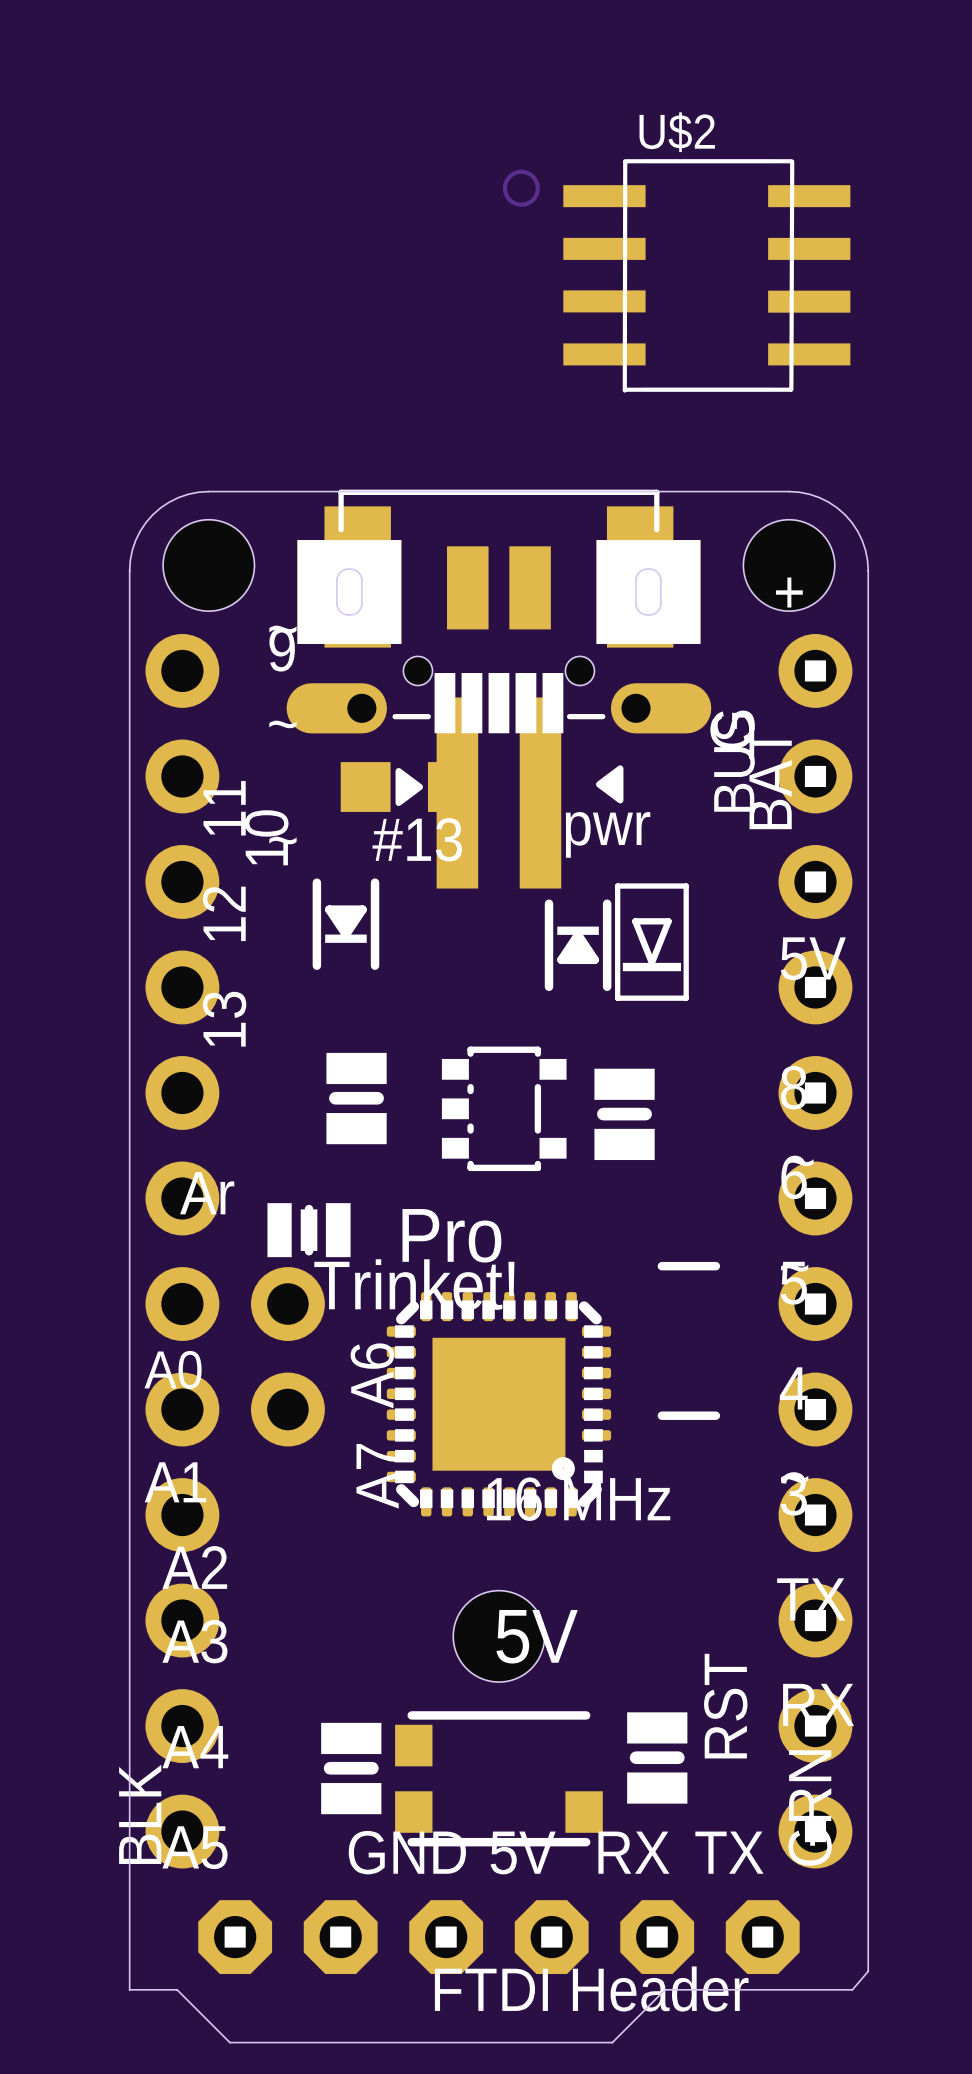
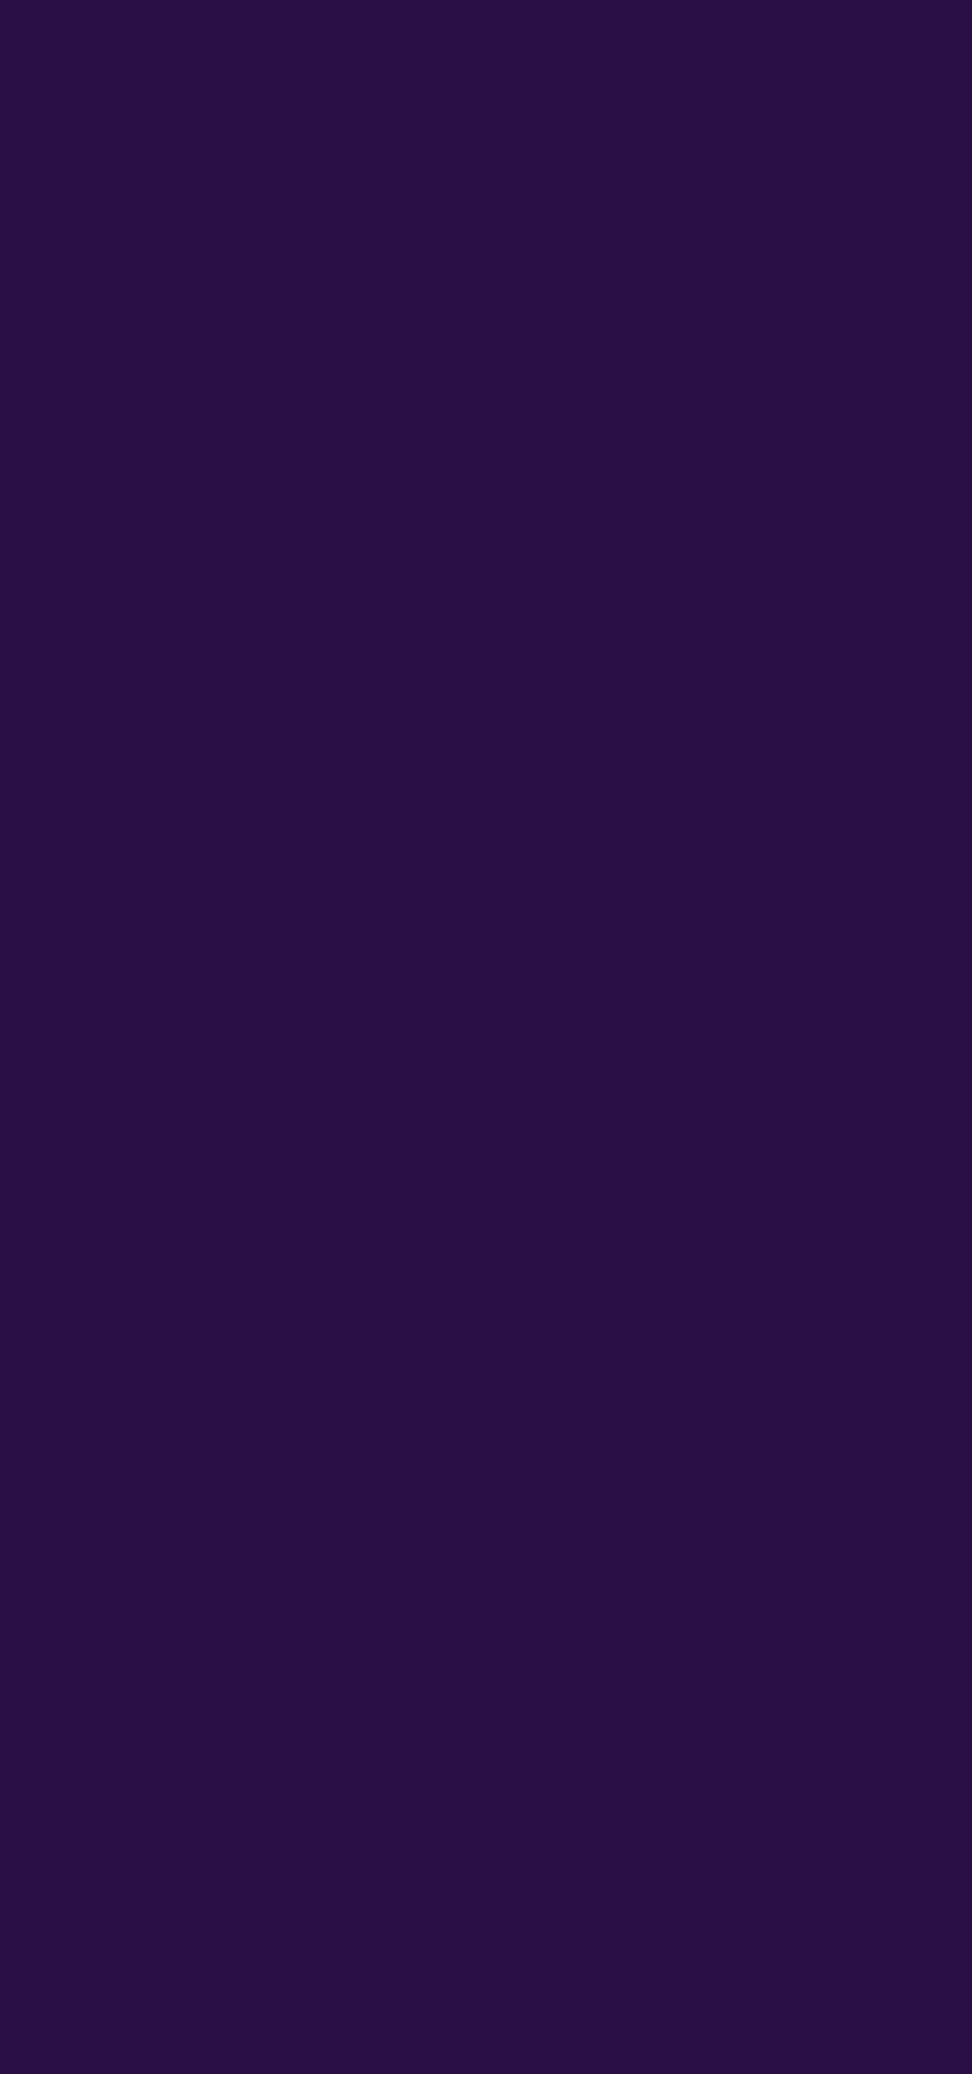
U$2: (676, 275) -> none
part: (498, 1266) -> none

